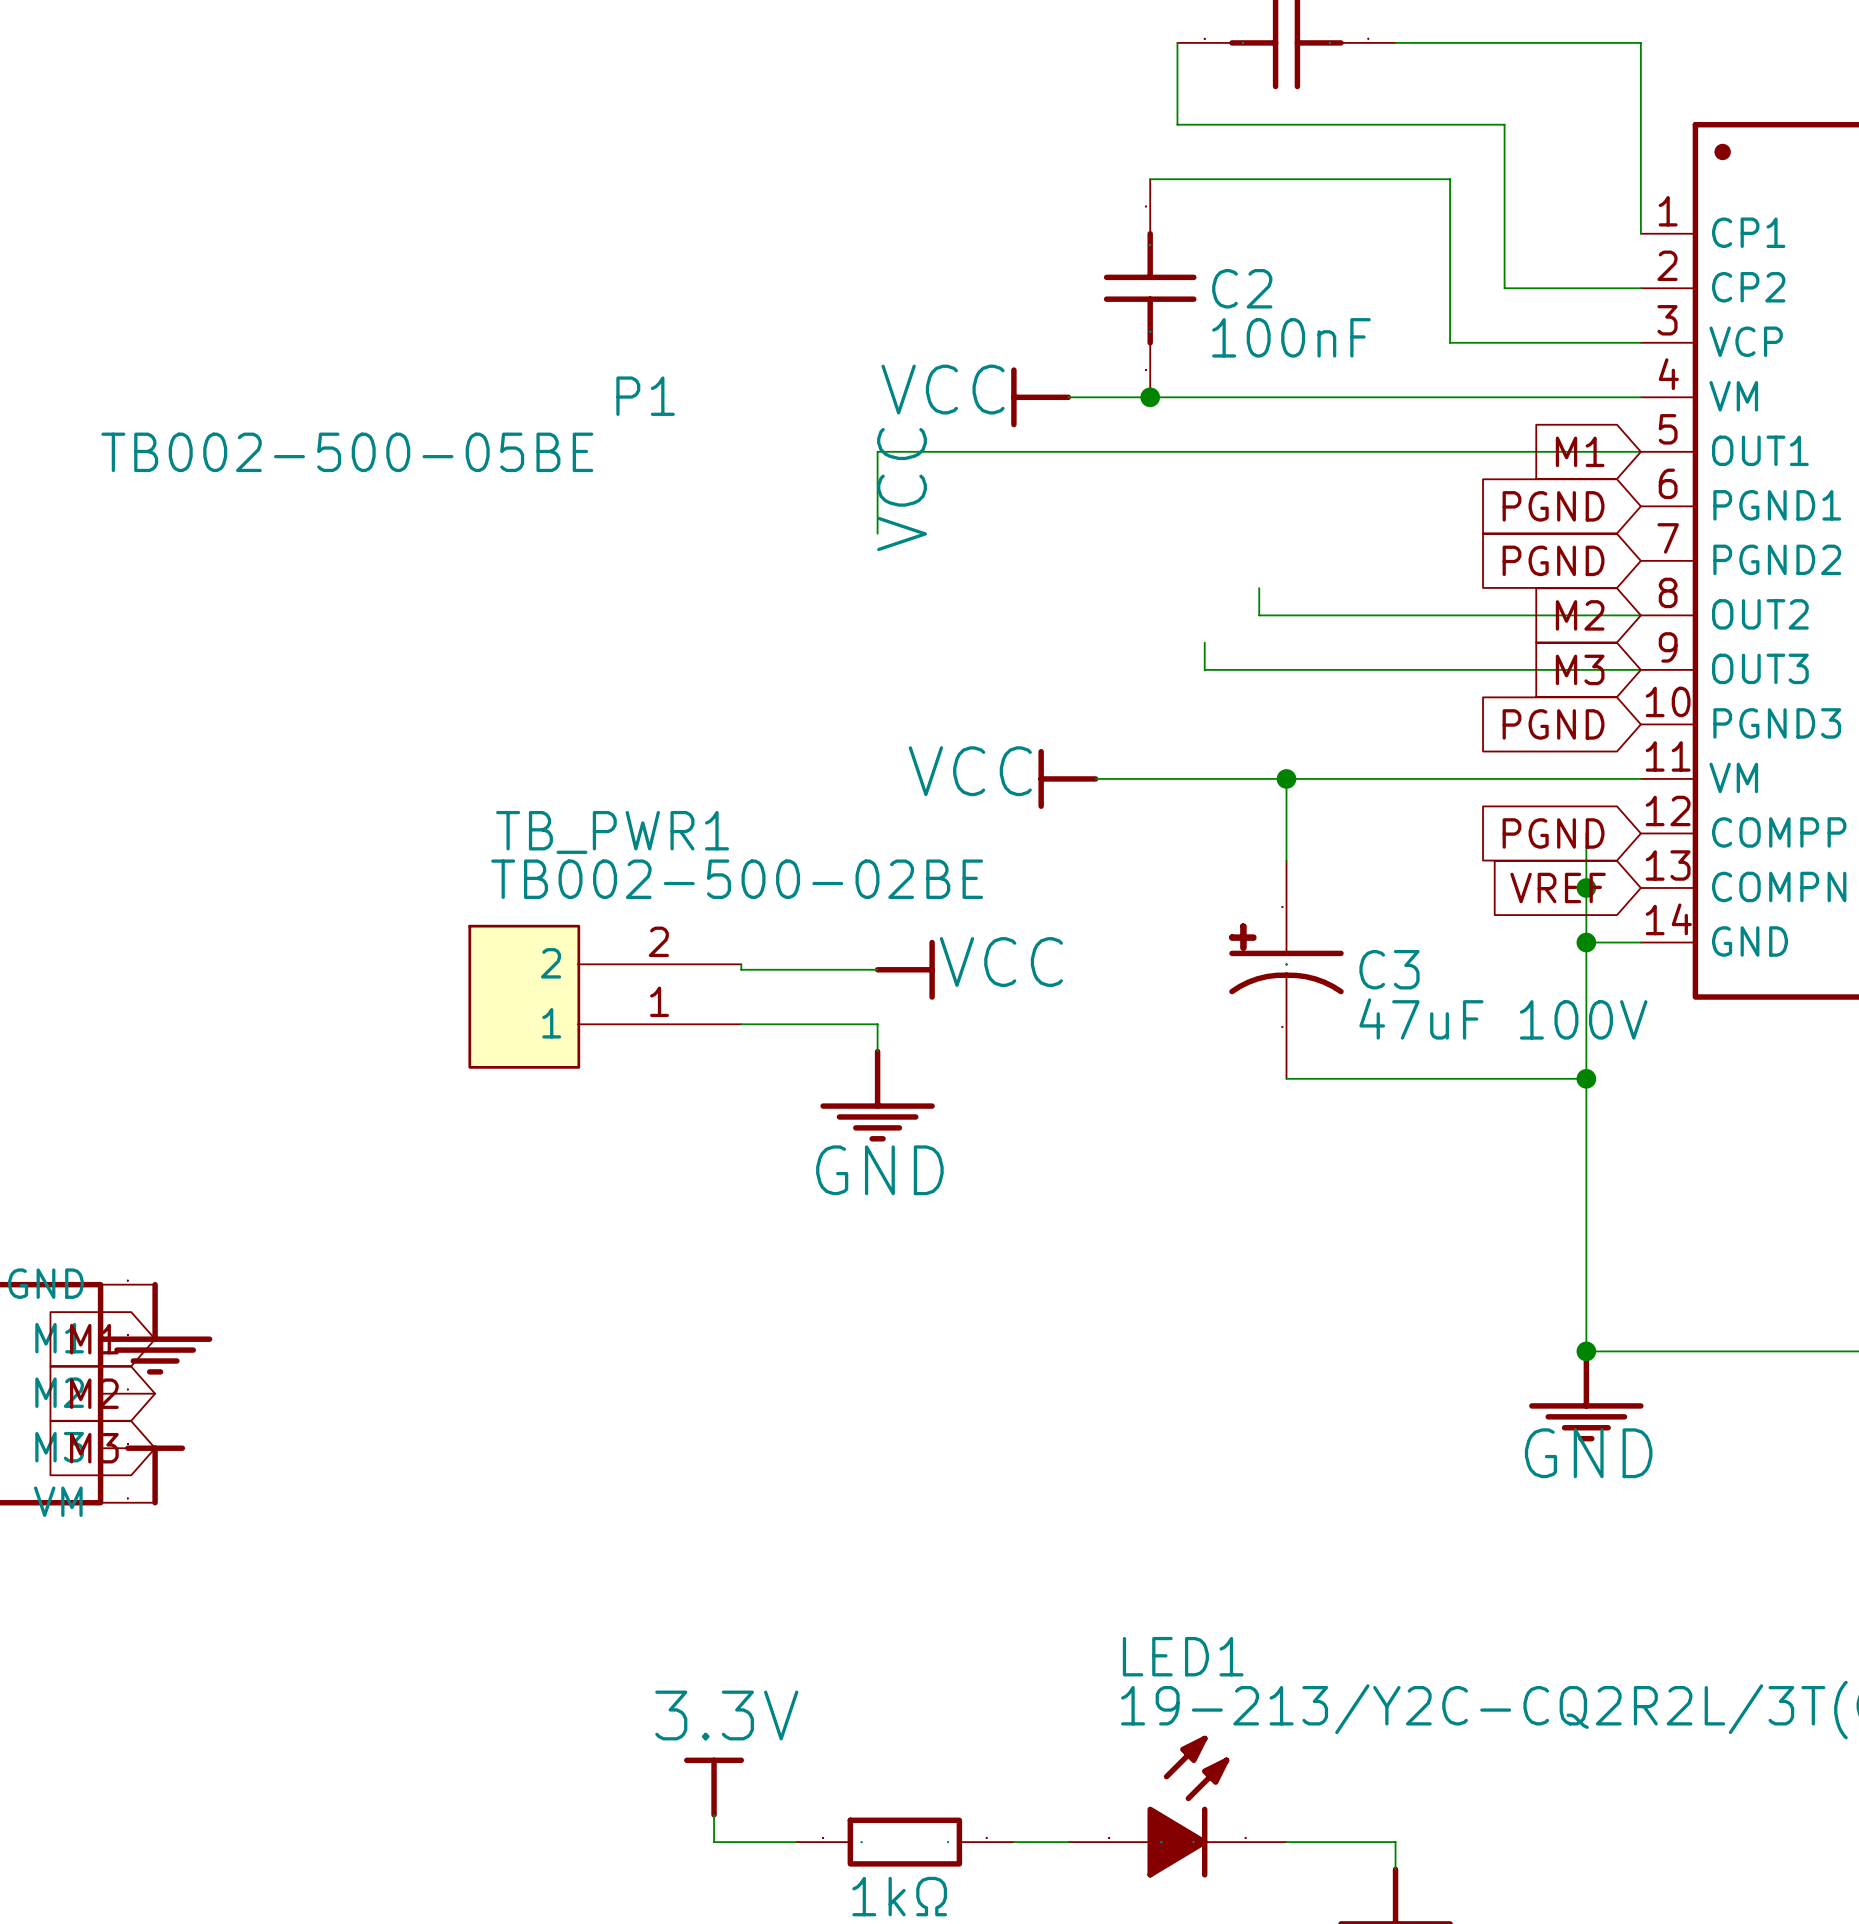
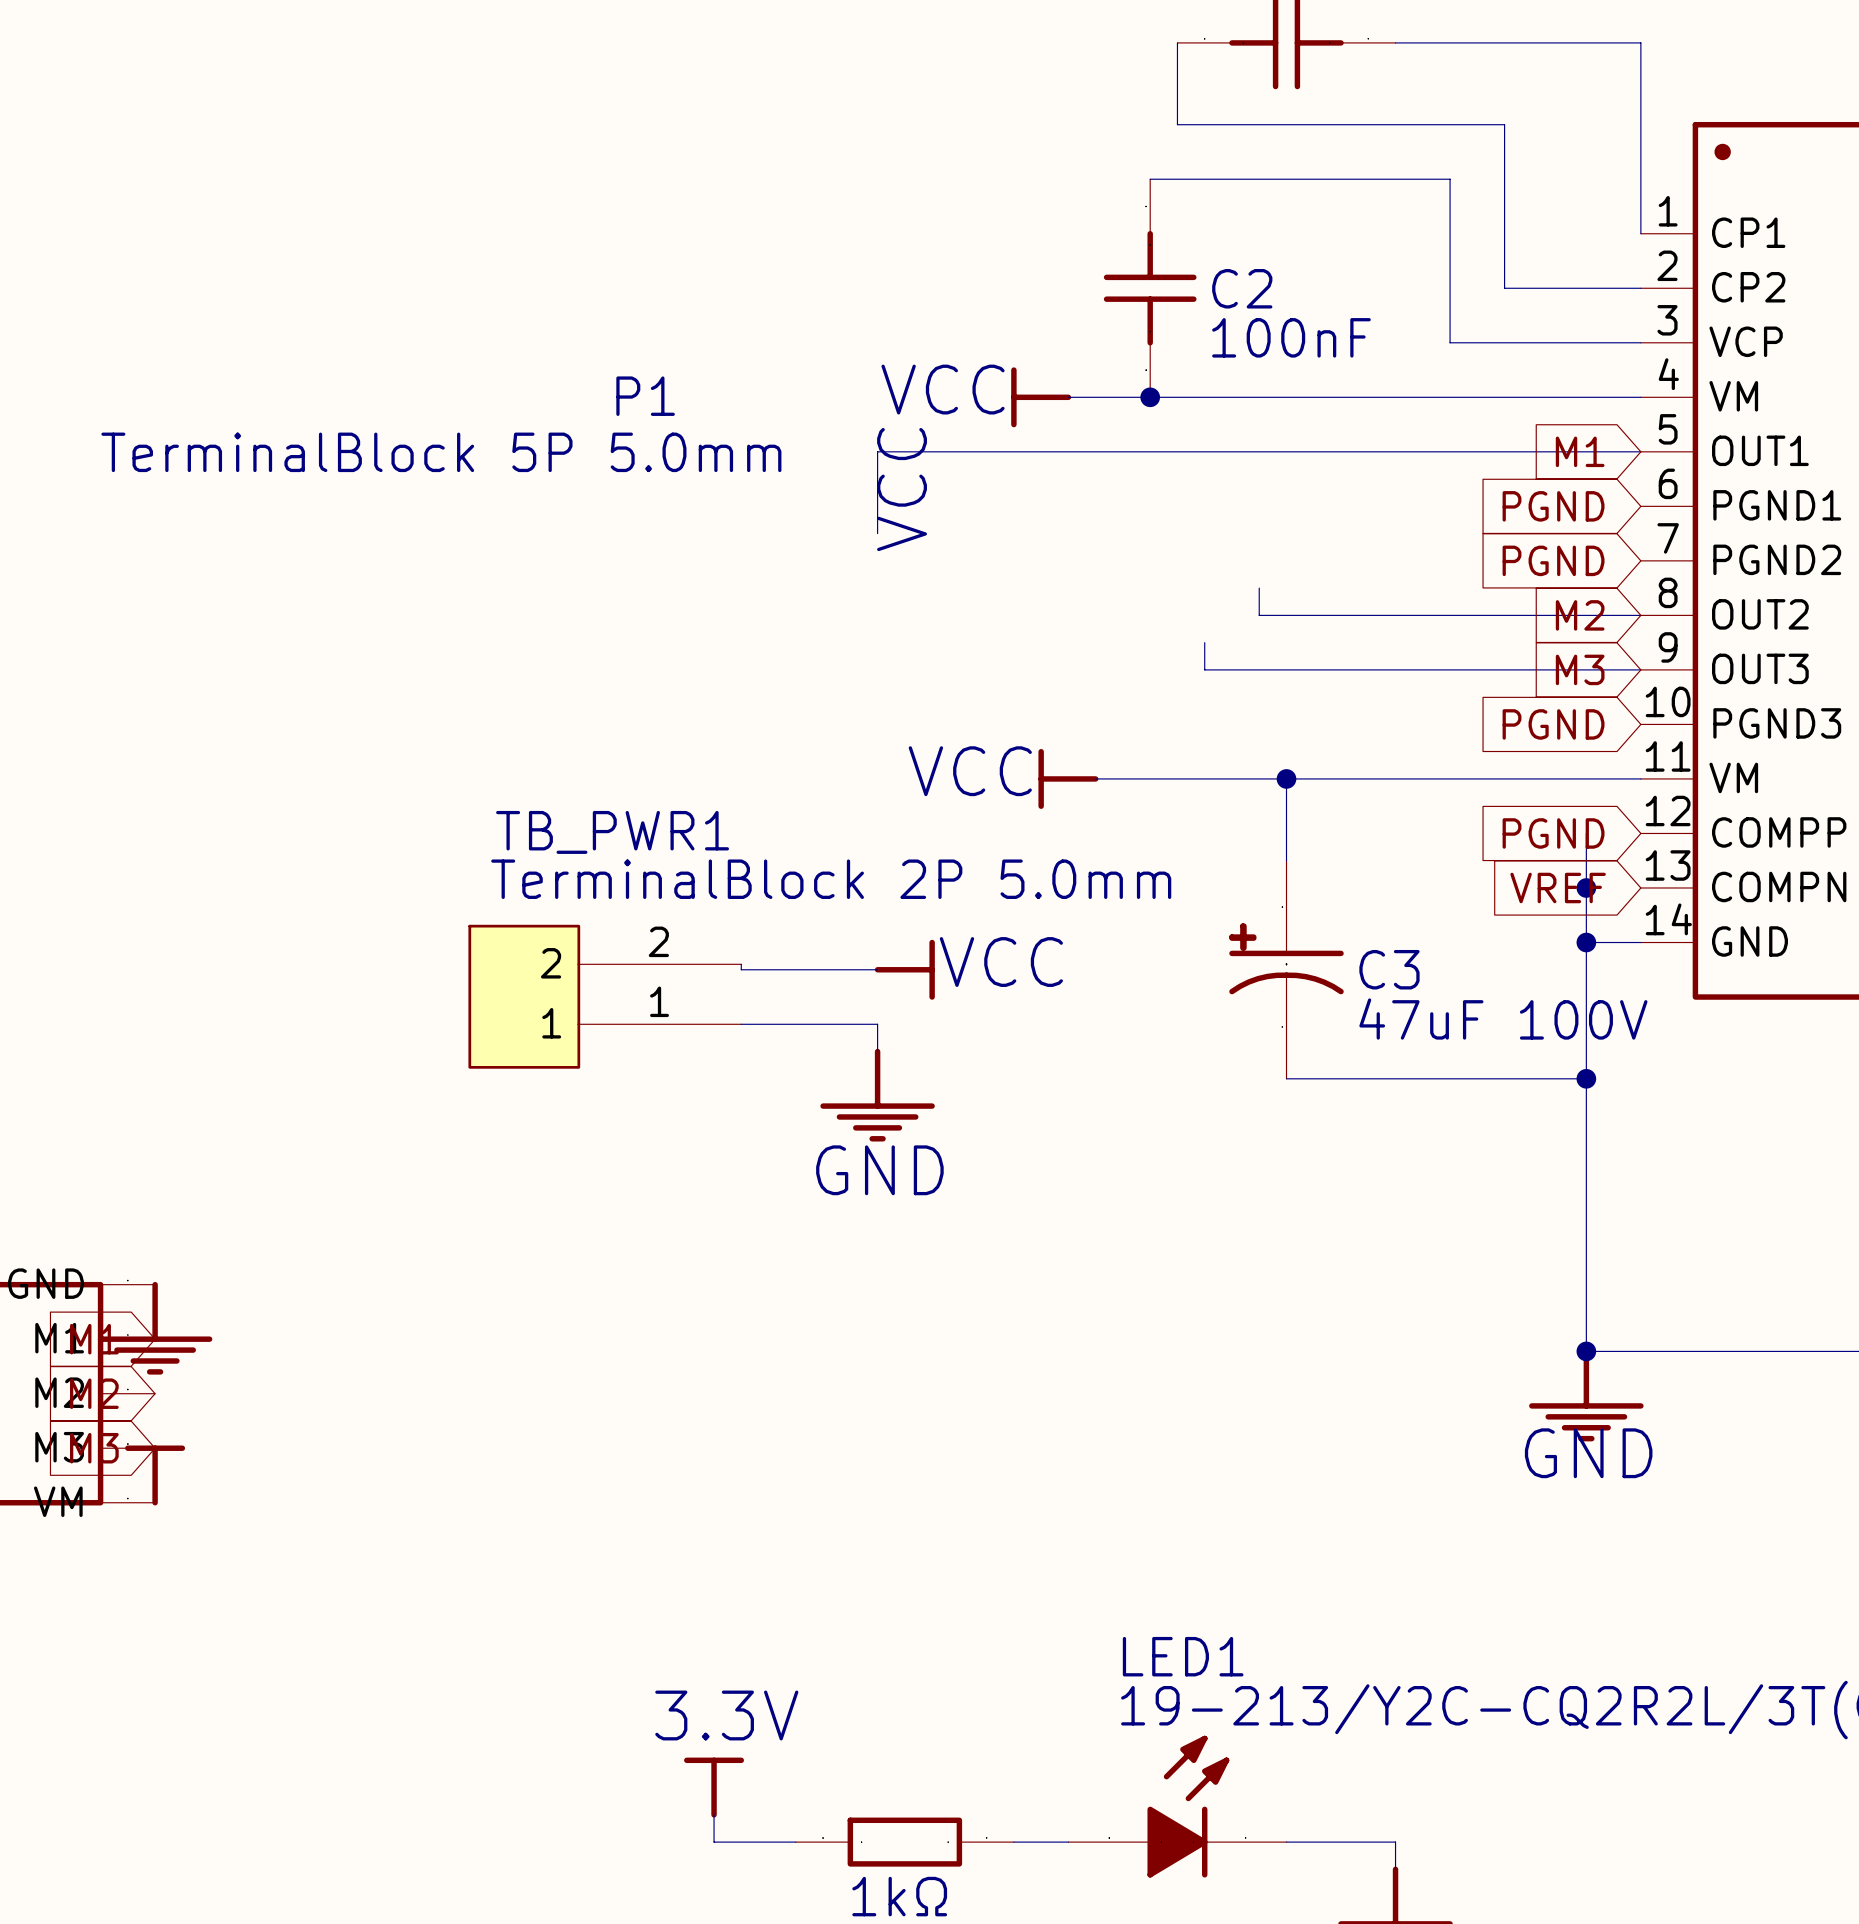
P1 value: TB002-500-05BE (347, 452) -> TerminalBlock 5P 5.0mm (441, 452)
TB_PWR1 value: TB002-500-02BE (737, 879) -> TerminalBlock 2P 5.0mm (831, 879)

